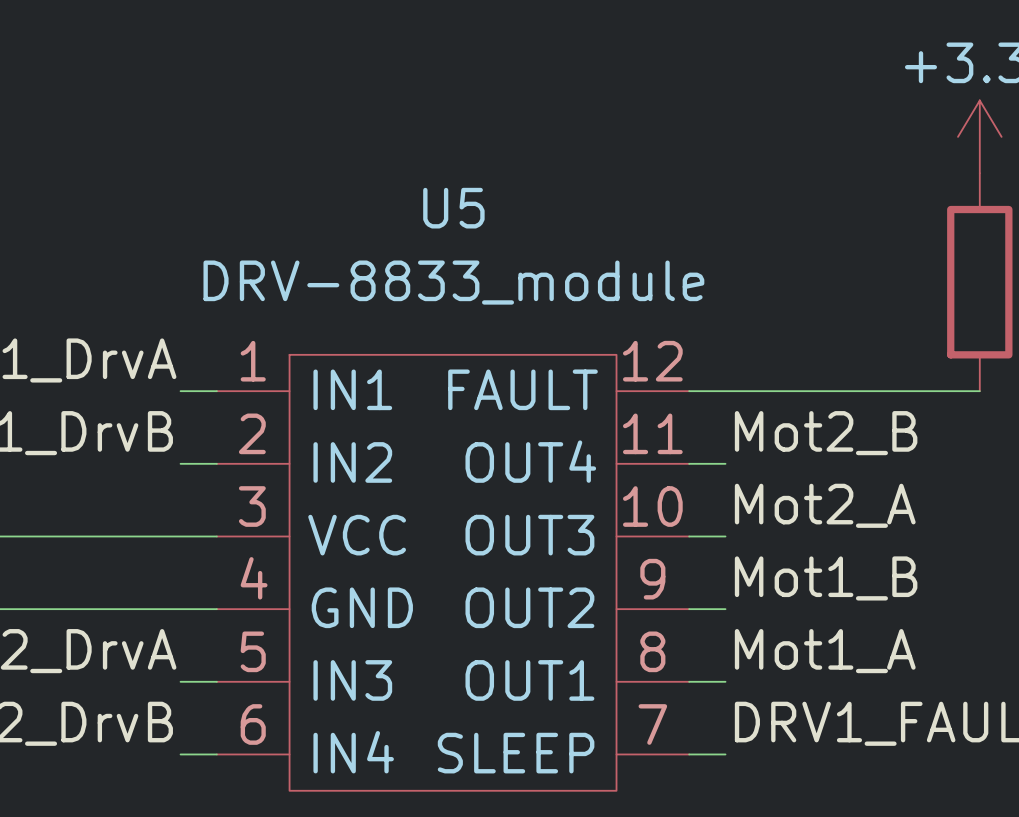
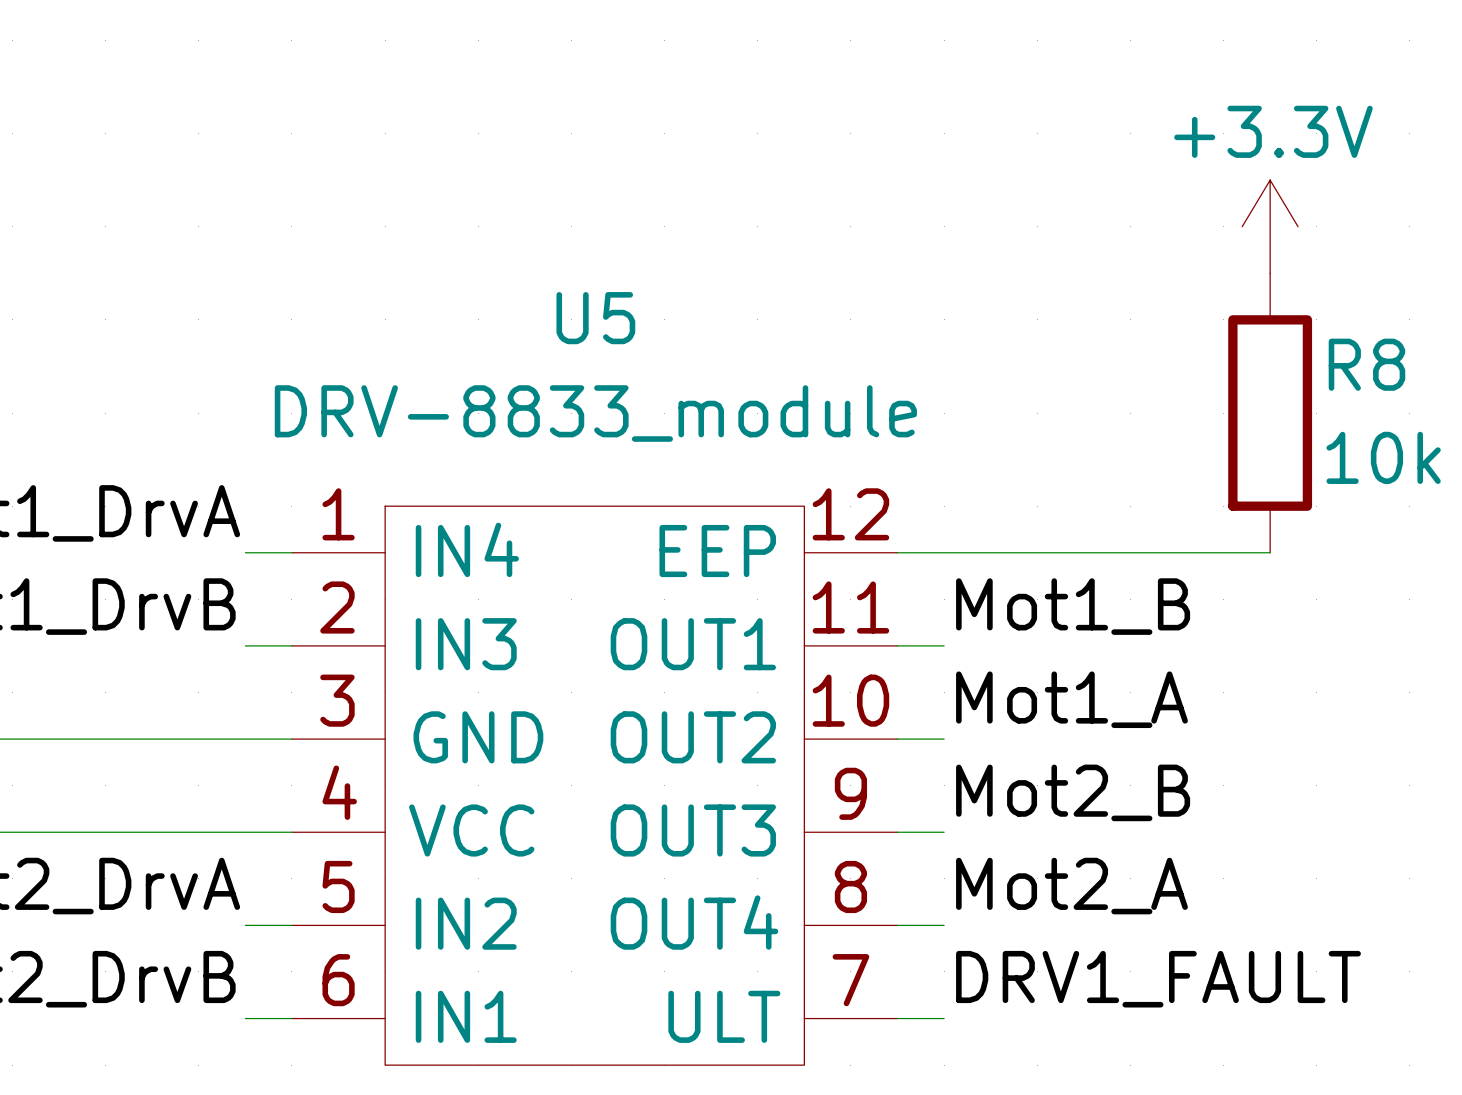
U5 symbol: [216, 354, 690, 791] -> [291, 506, 898, 1066]
label: Mot2_B (826, 433) -> Mot1_B (1073, 606)
label: Mot2_A (825, 505) -> Mot1_A (1071, 699)
label: Mot1_B (826, 578) -> Mot2_B (1073, 792)
label: Mot1_A (825, 651) -> Mot2_A (1071, 886)

